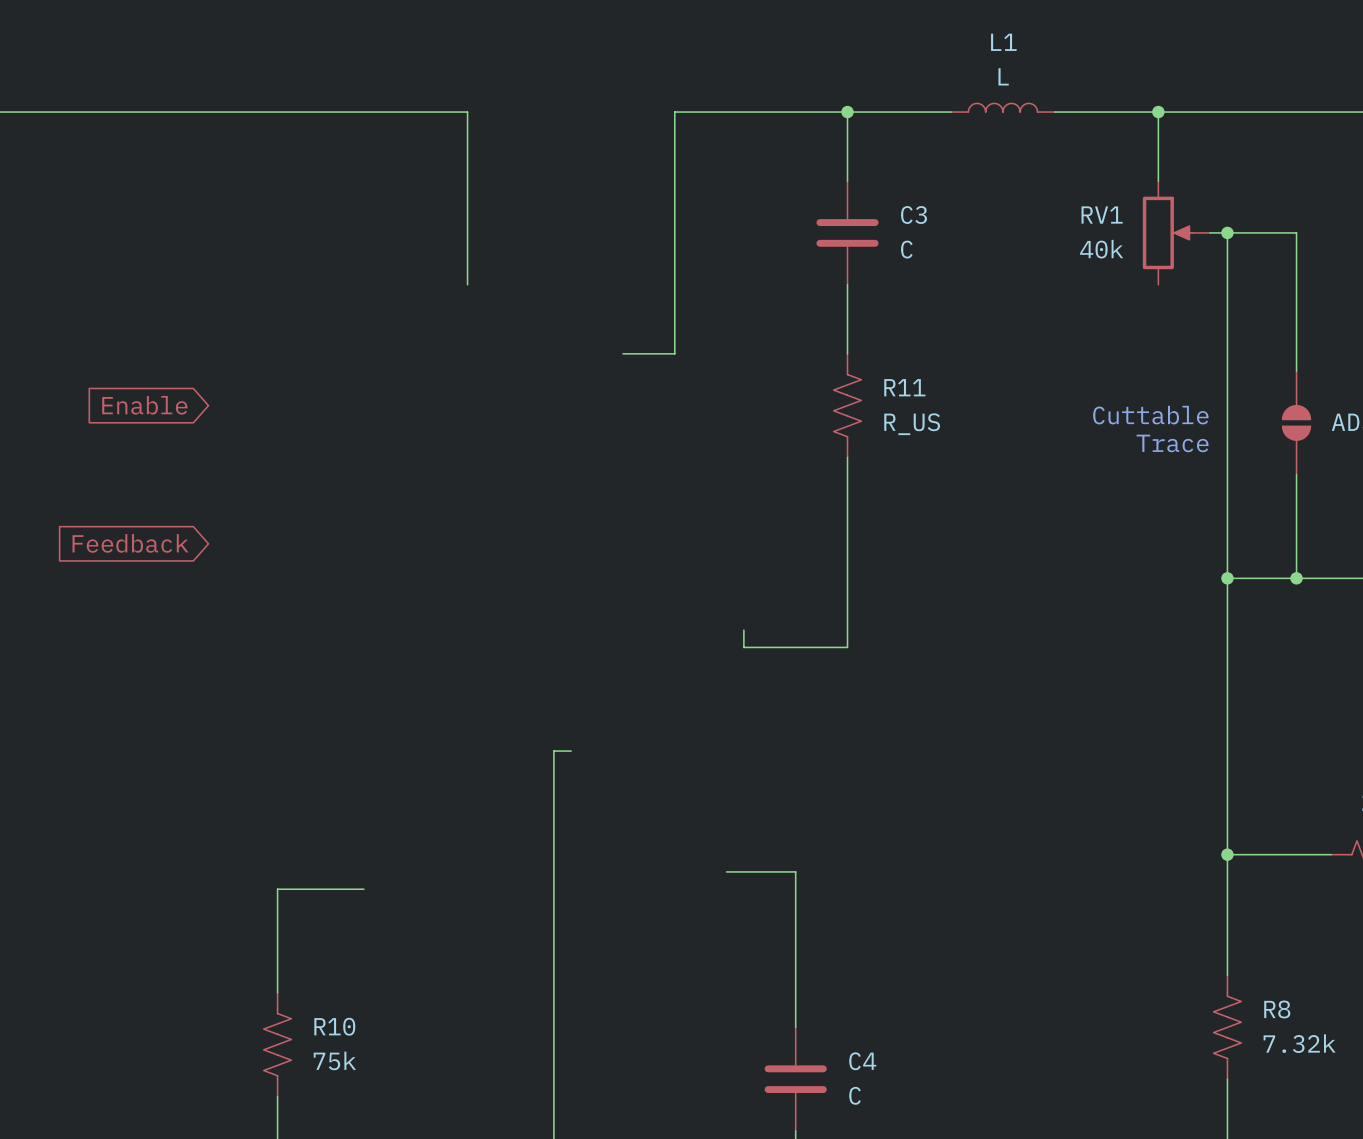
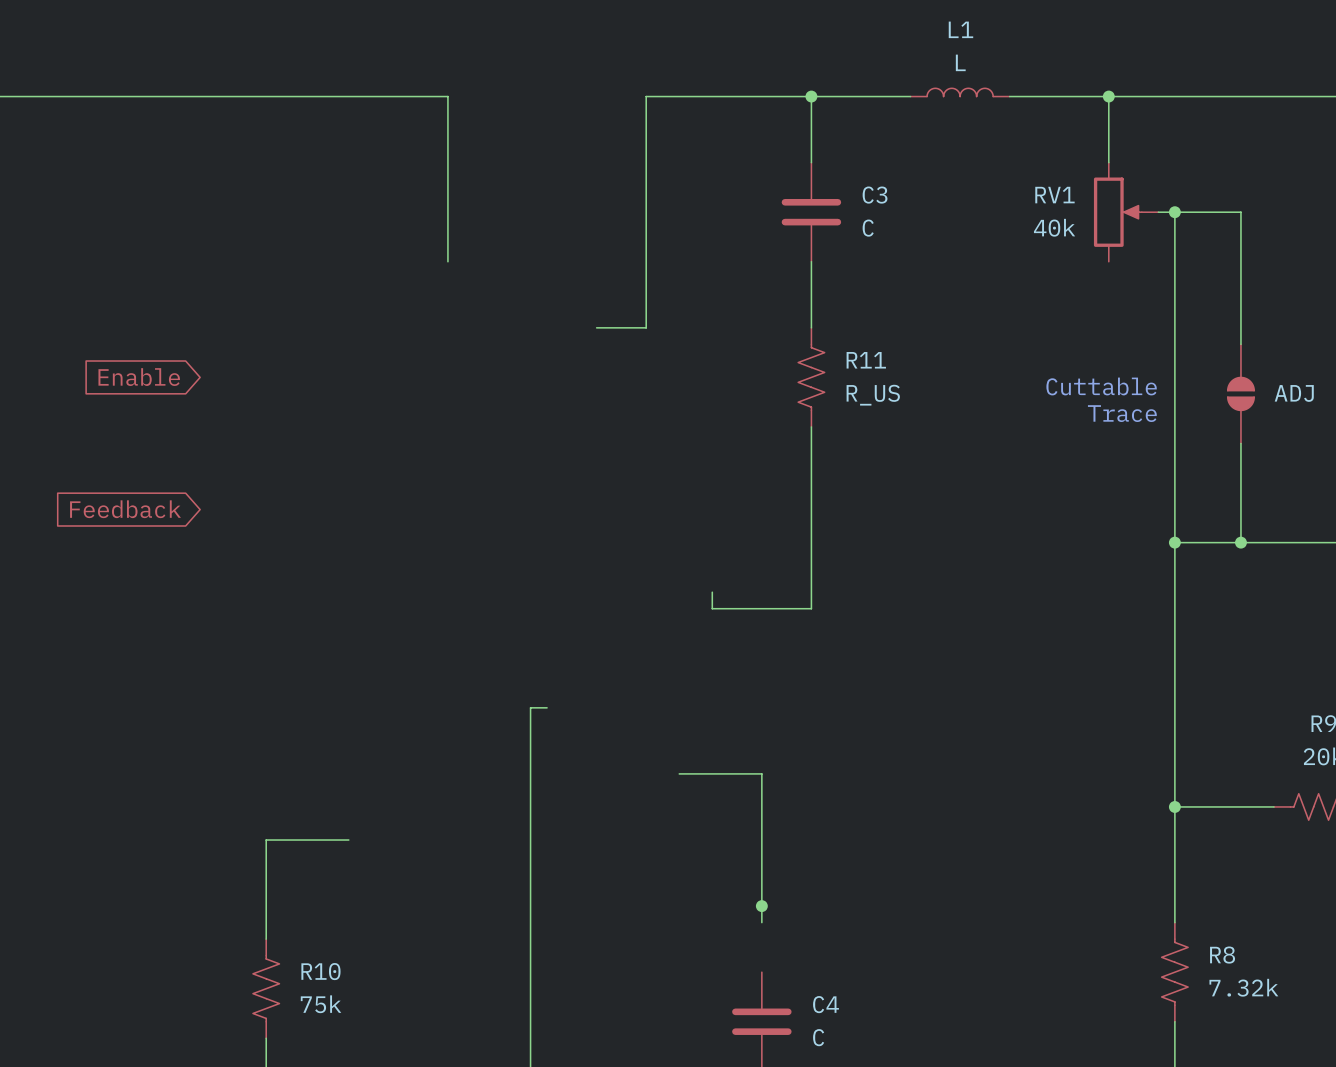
wire: (726, 871) (795, 871) -> (679, 773) (761, 773) (761, 823)
junction: none -> (761, 906)
wire: (795, 975) (795, 1027) -> none

